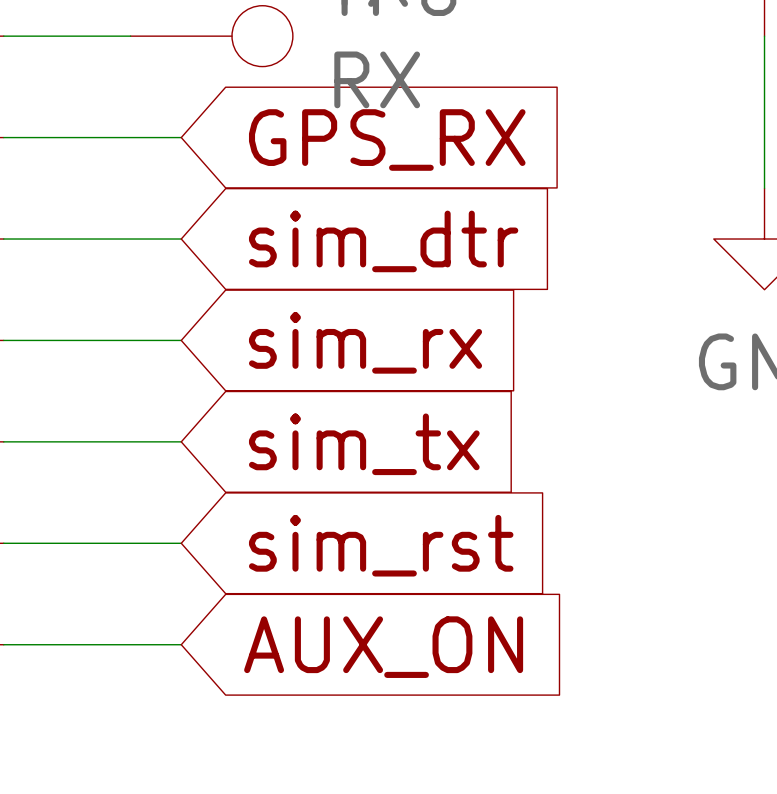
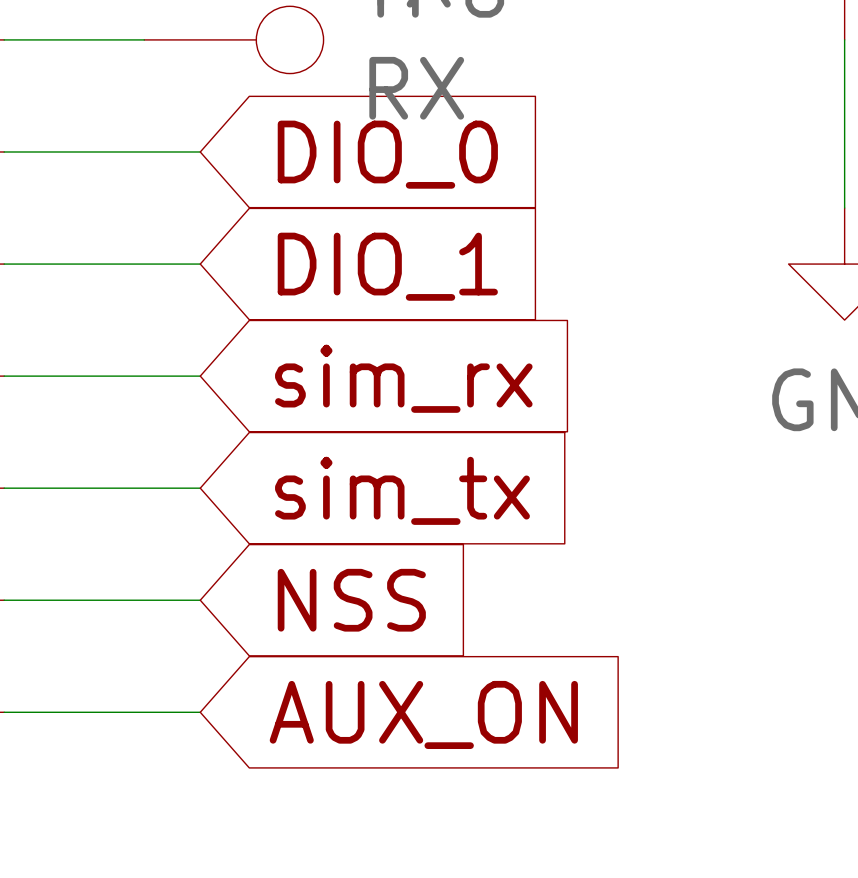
global label: GPS_RX (387, 139) -> DIO_0 (387, 154)
global label: sim_dtr (383, 241) -> DIO_1 (387, 266)
global label: sim_rst (381, 545) -> NSS (351, 600)

